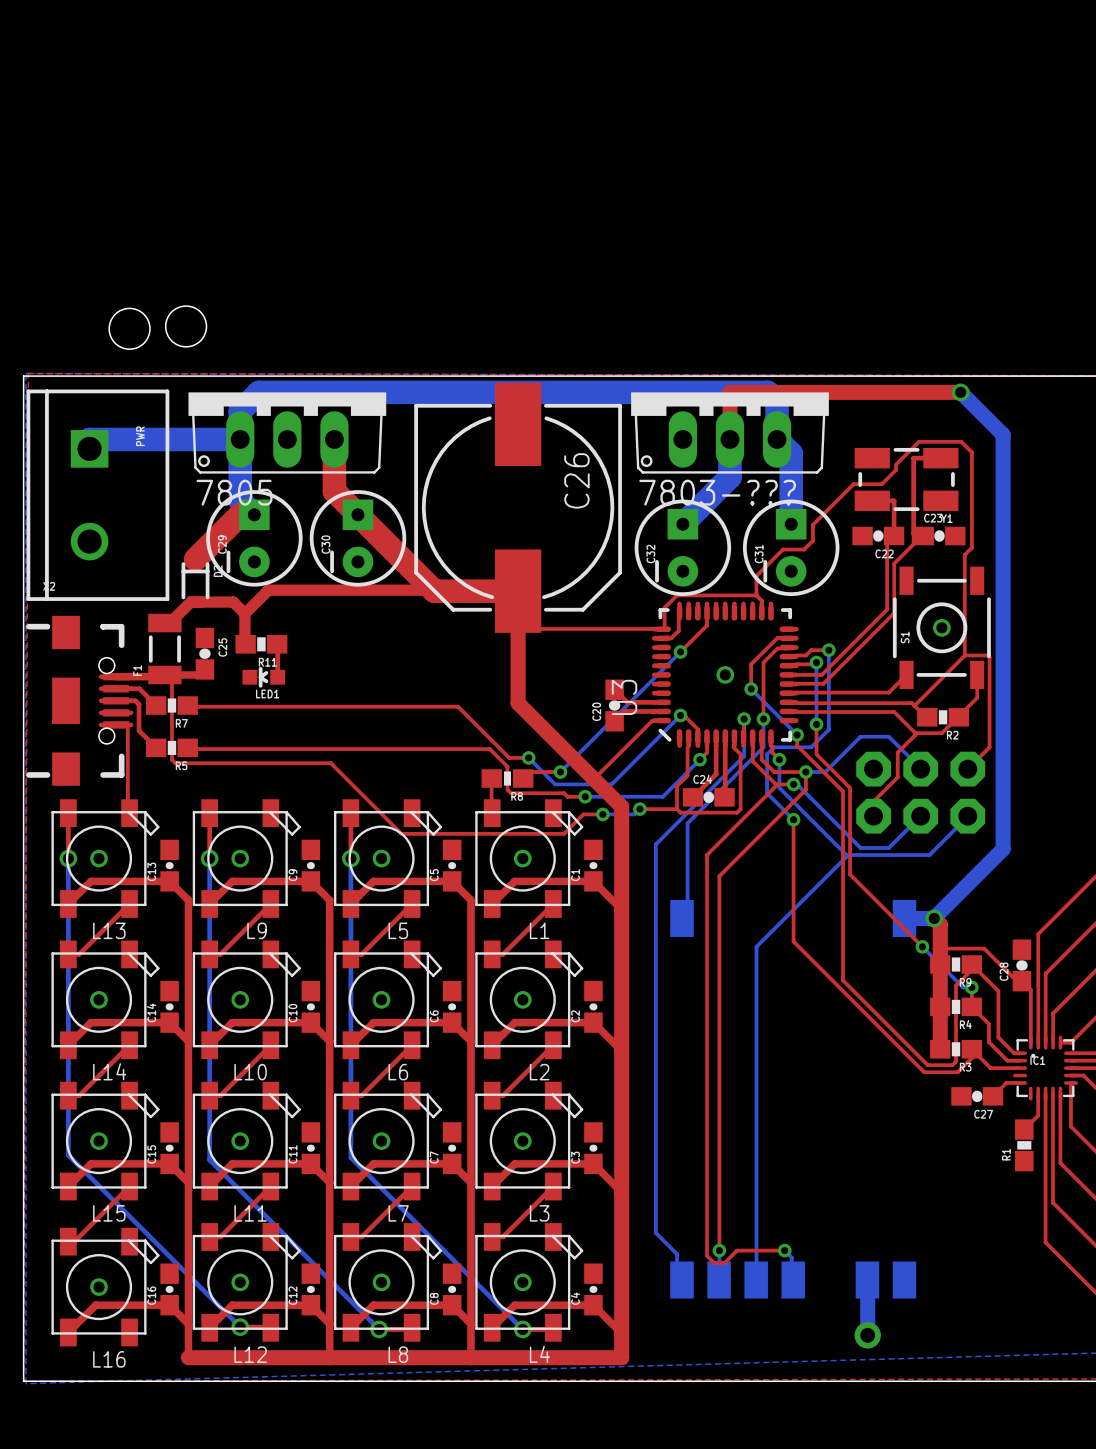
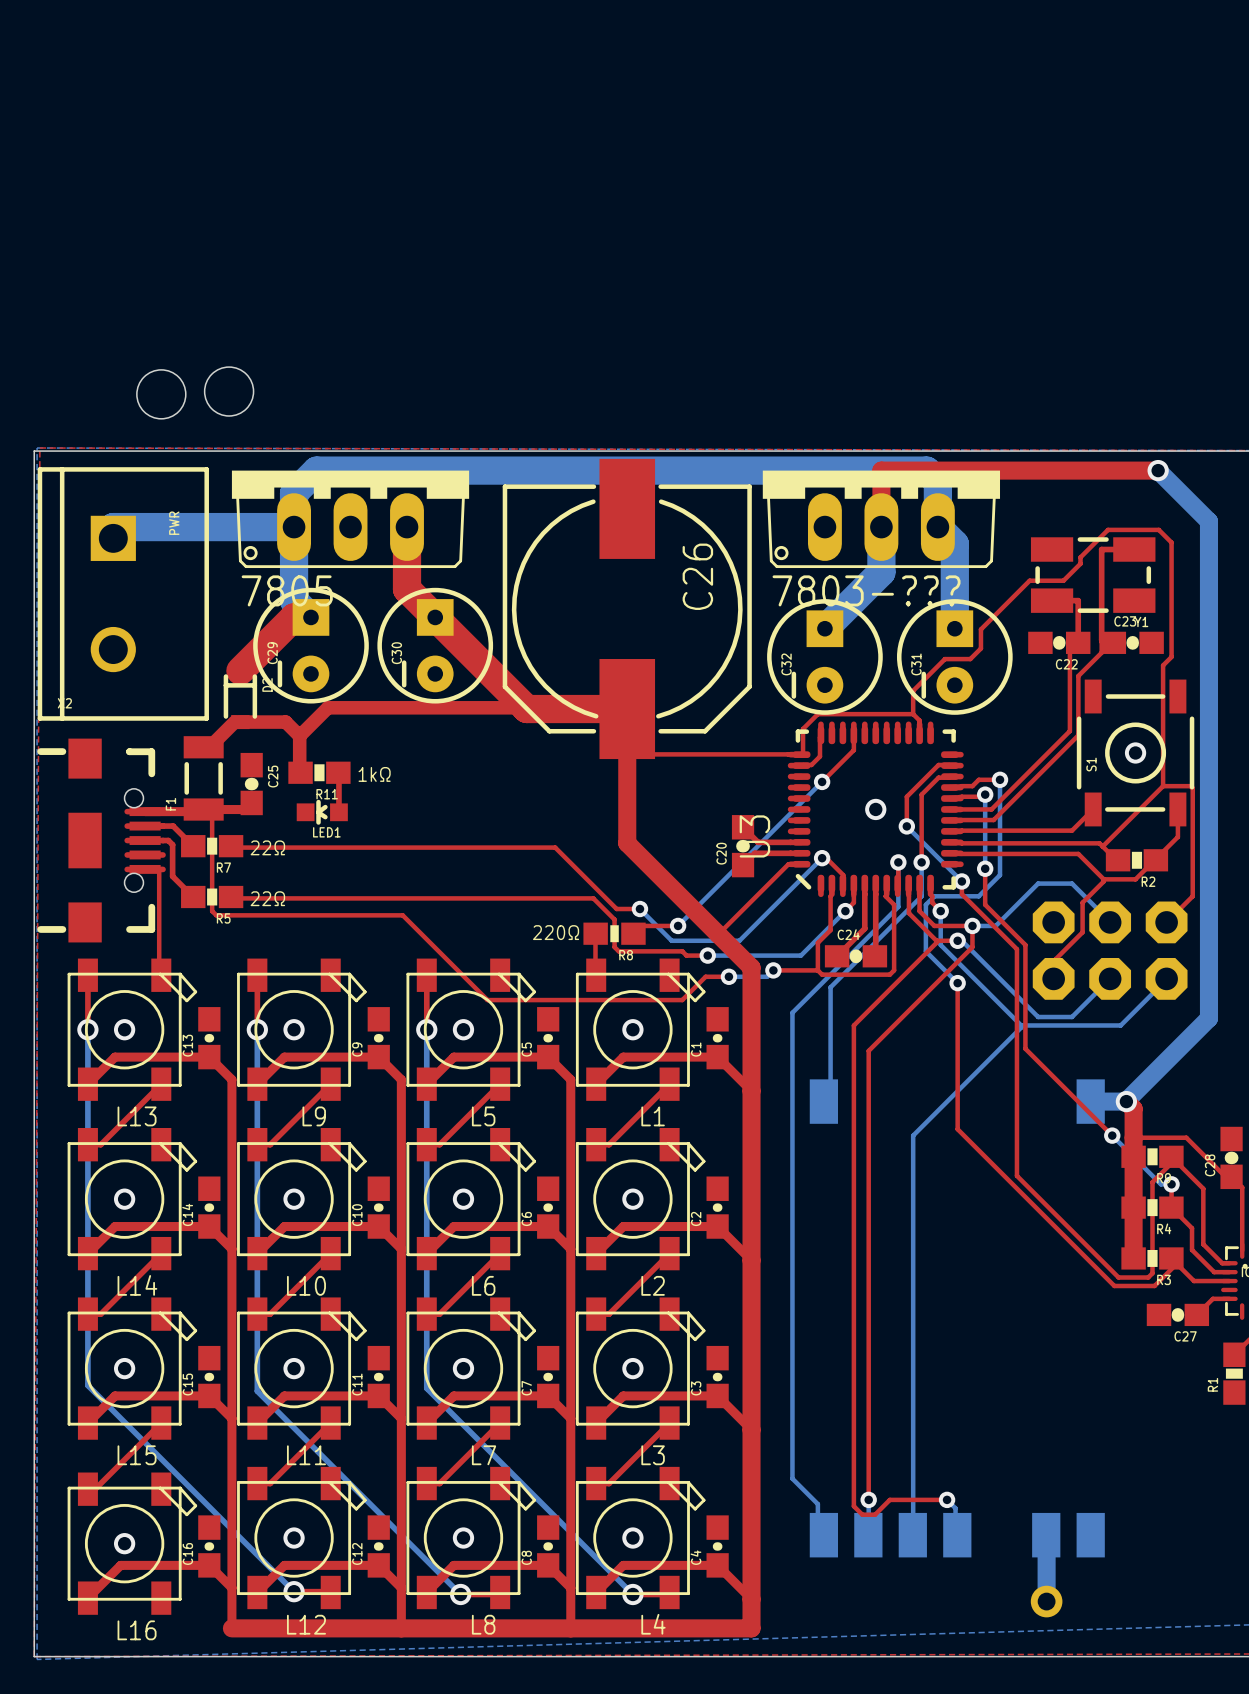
text: none -> 1kΩ (374, 774)
text: none -> 22Ω (267, 847)
text: none -> 22Ω (267, 898)
text: none -> 220Ω (556, 932)

